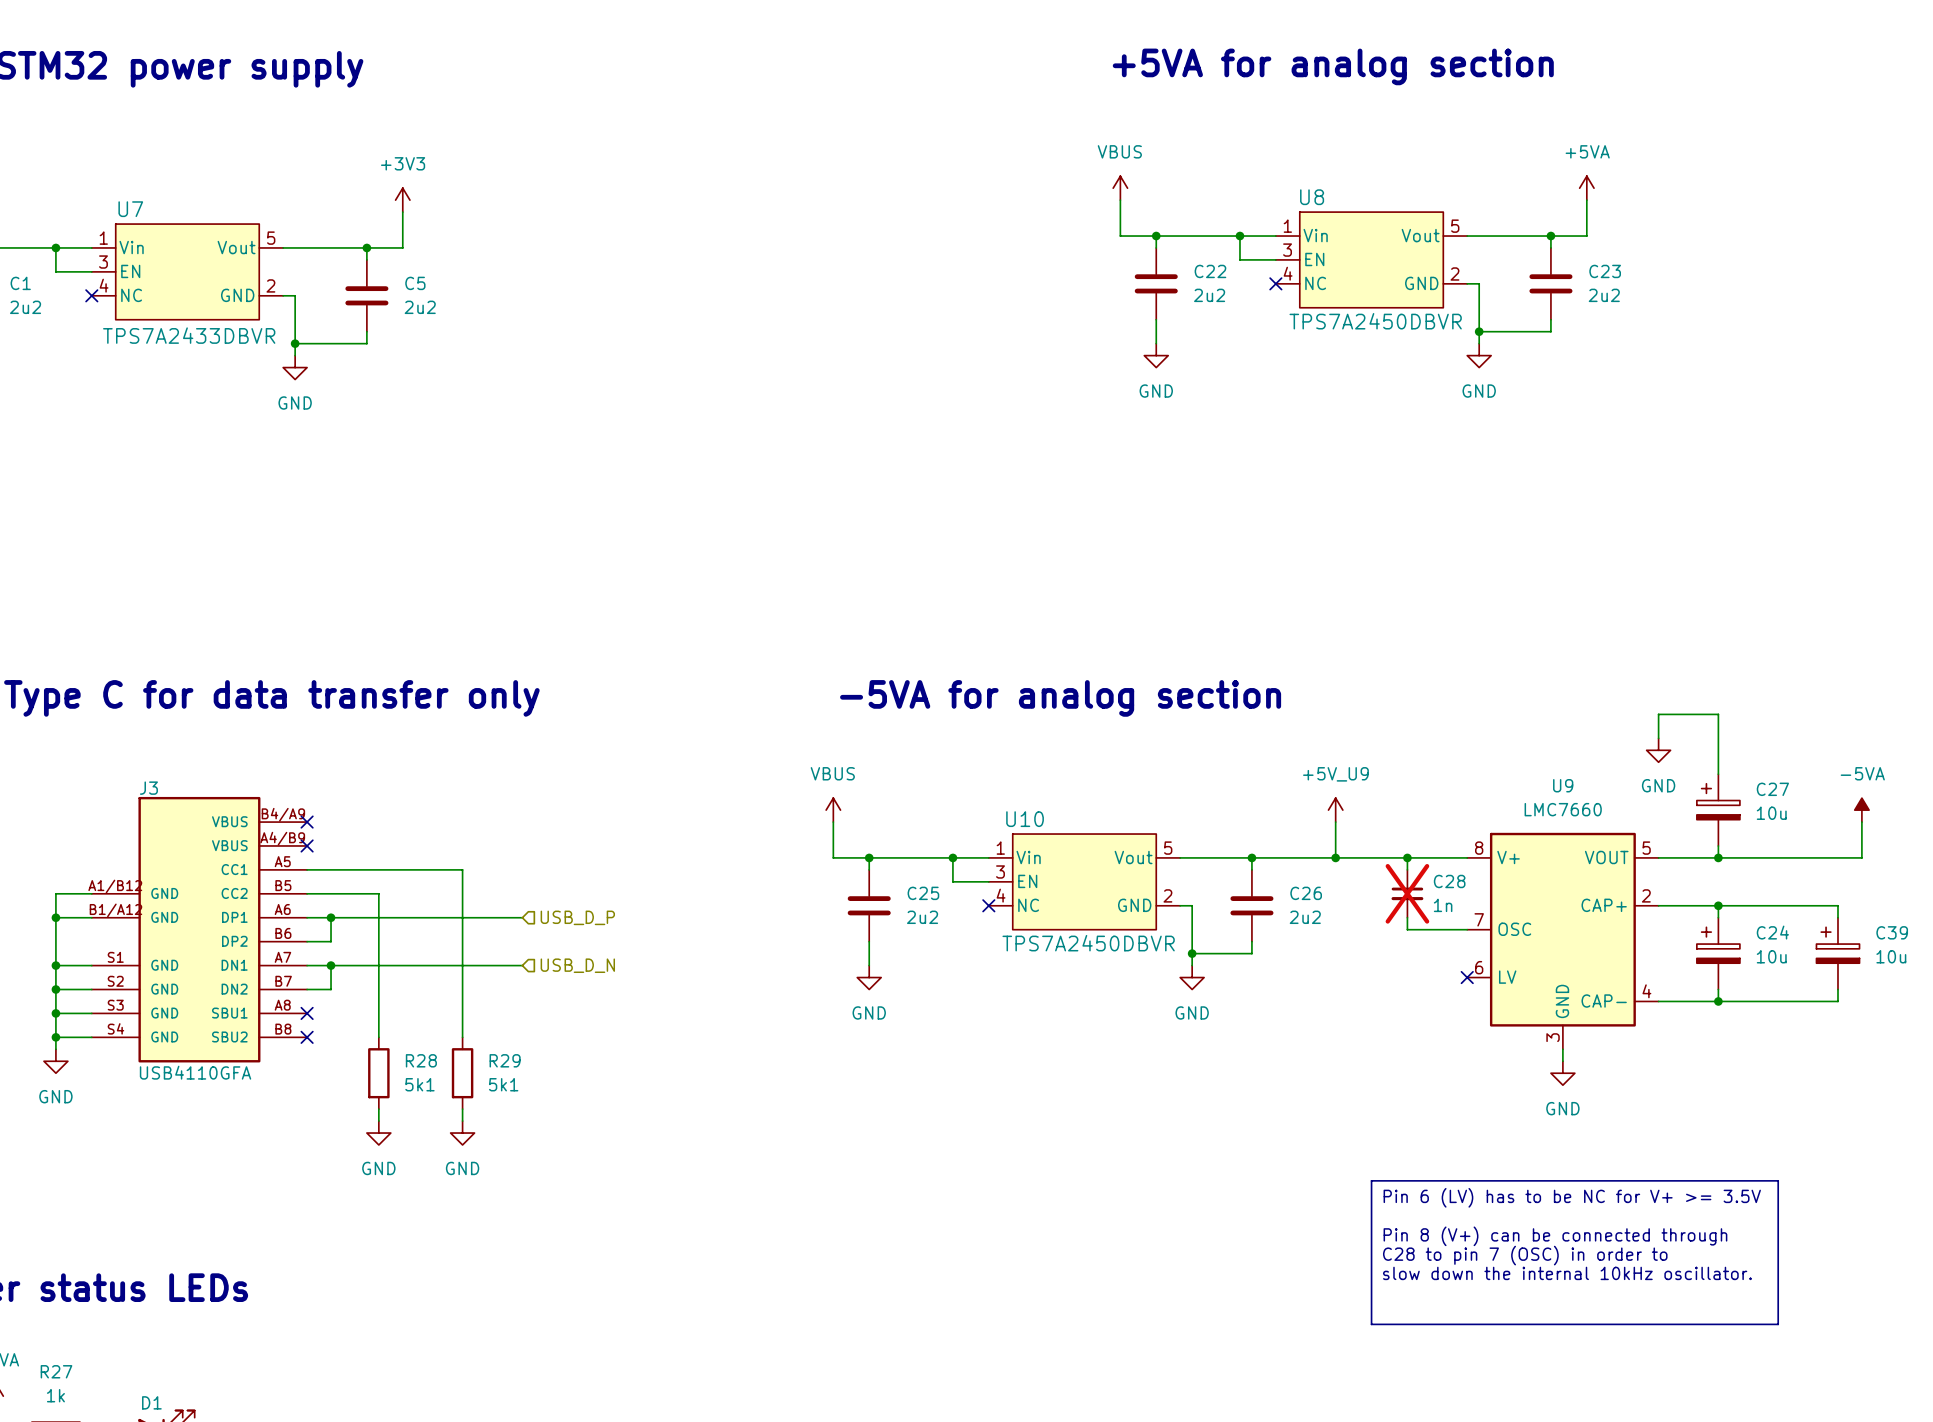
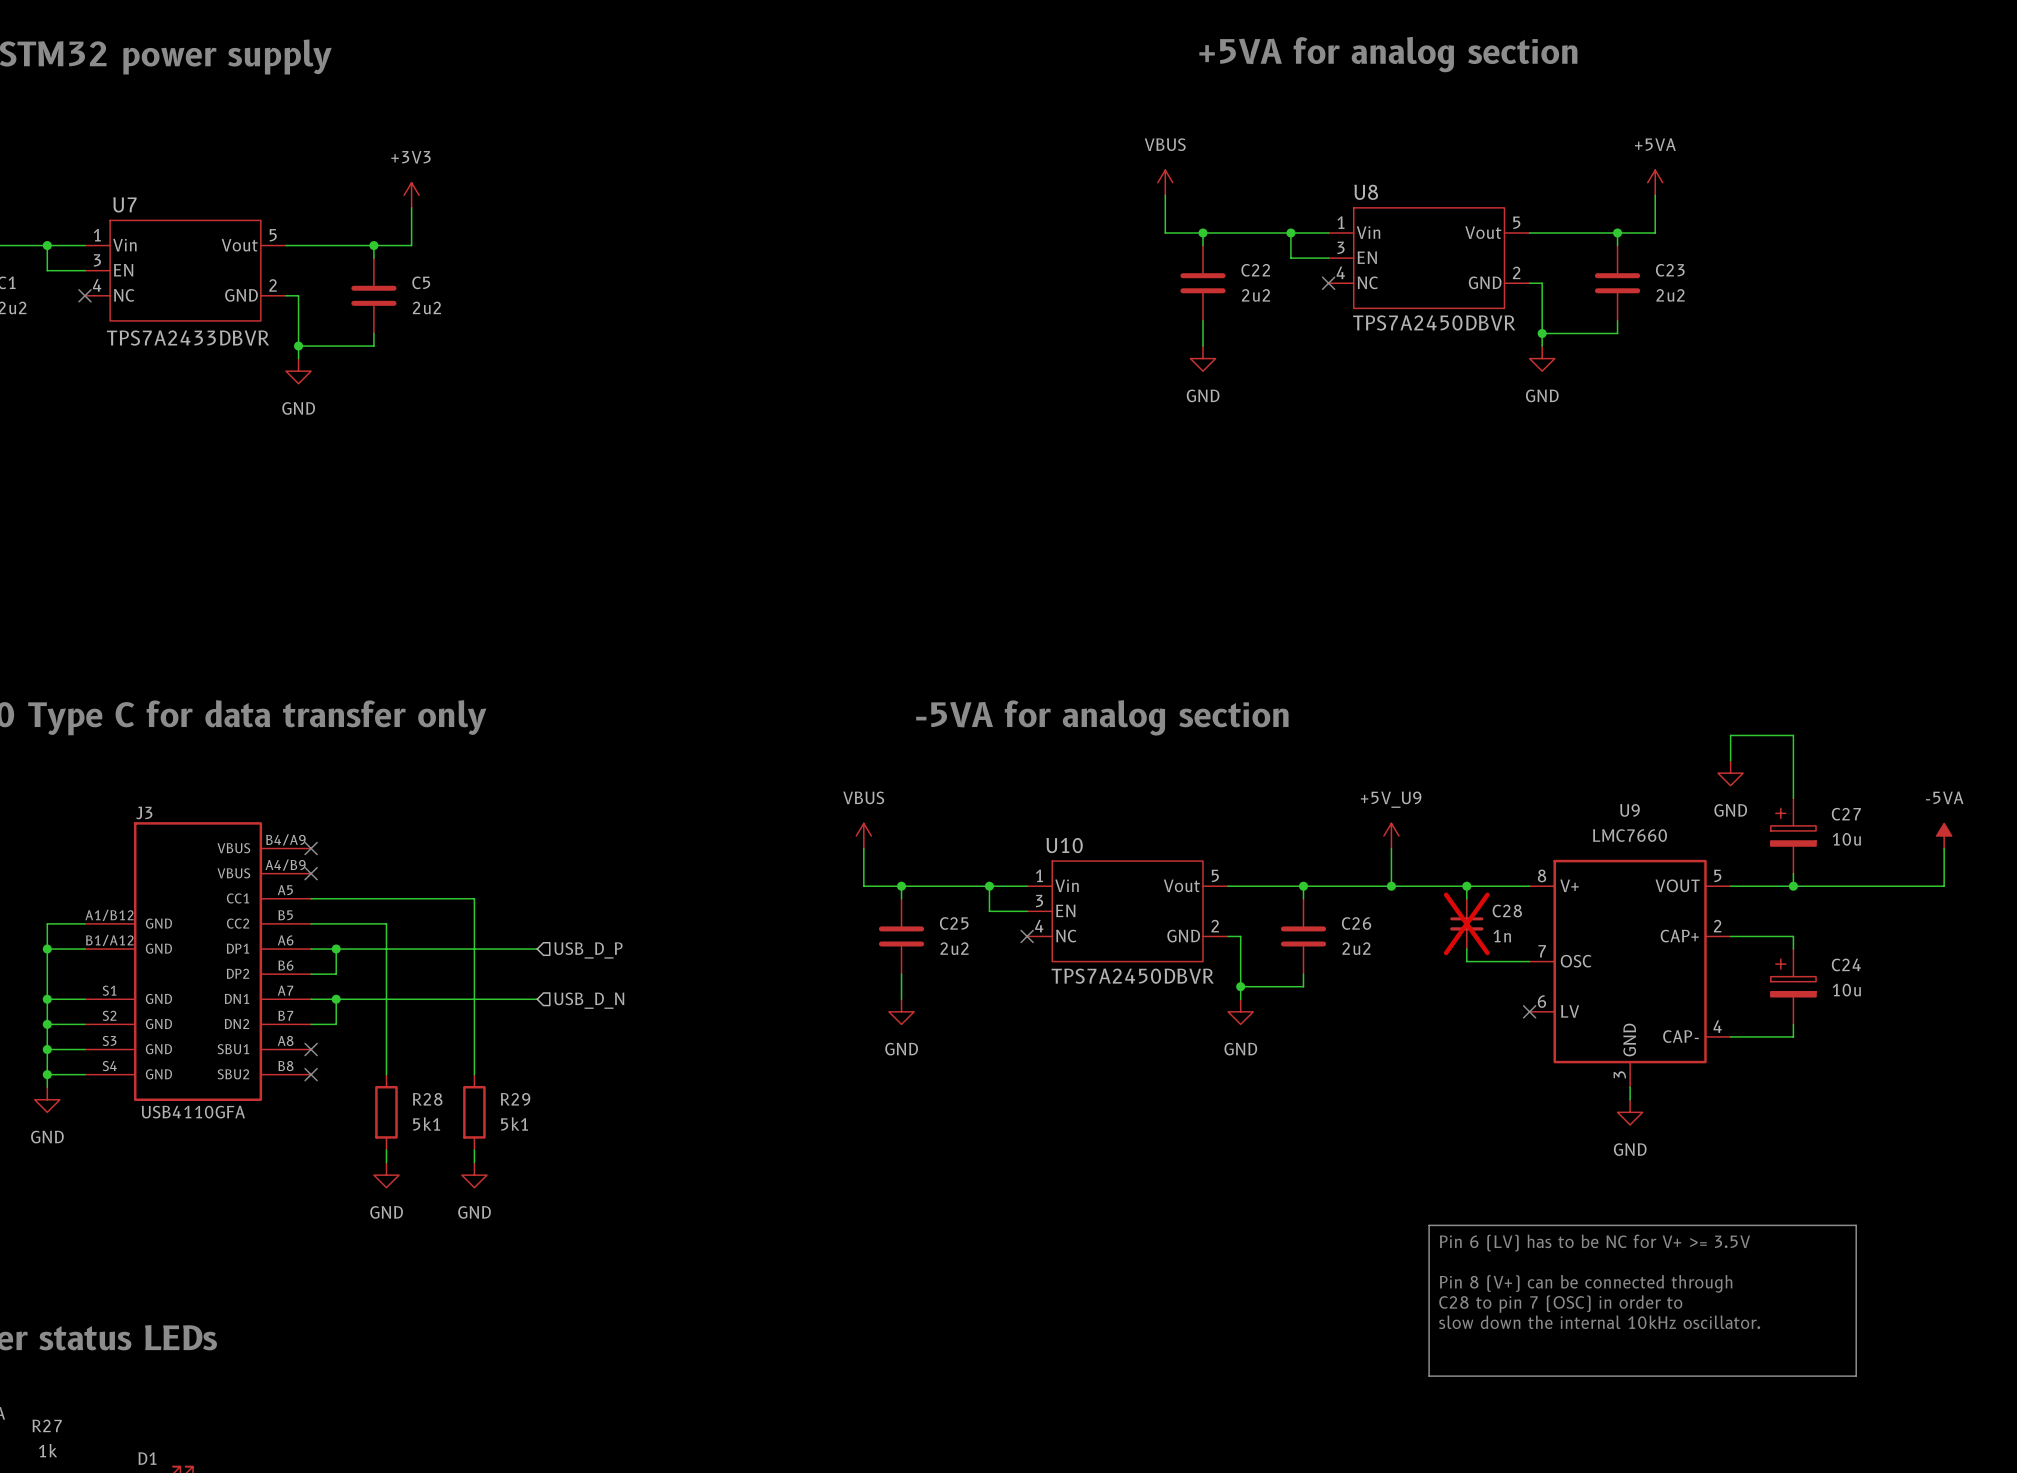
wire: (1718, 905) (1837, 905) (1837, 917) -> none
junction: (1718, 905) -> none
C39: 10u (1837, 953) -> none
wire: (1837, 989) (1837, 1001) (1718, 1001) -> none
junction: (1718, 1001) -> none

